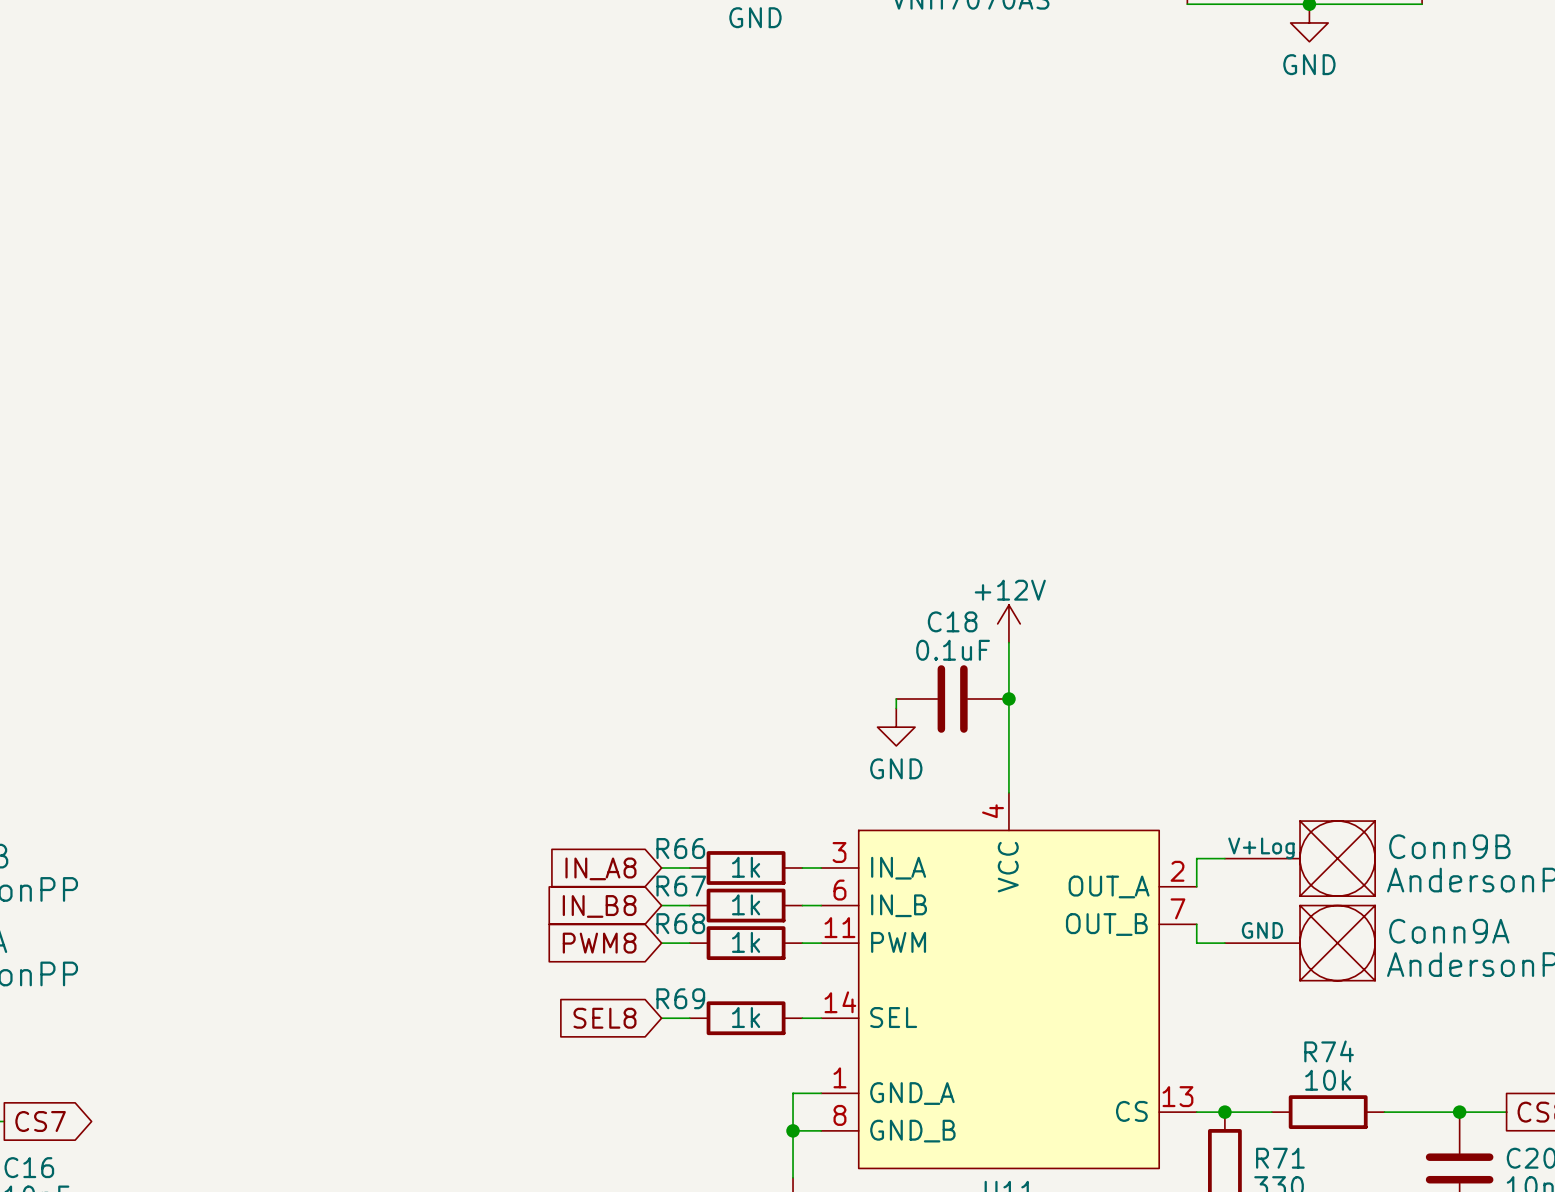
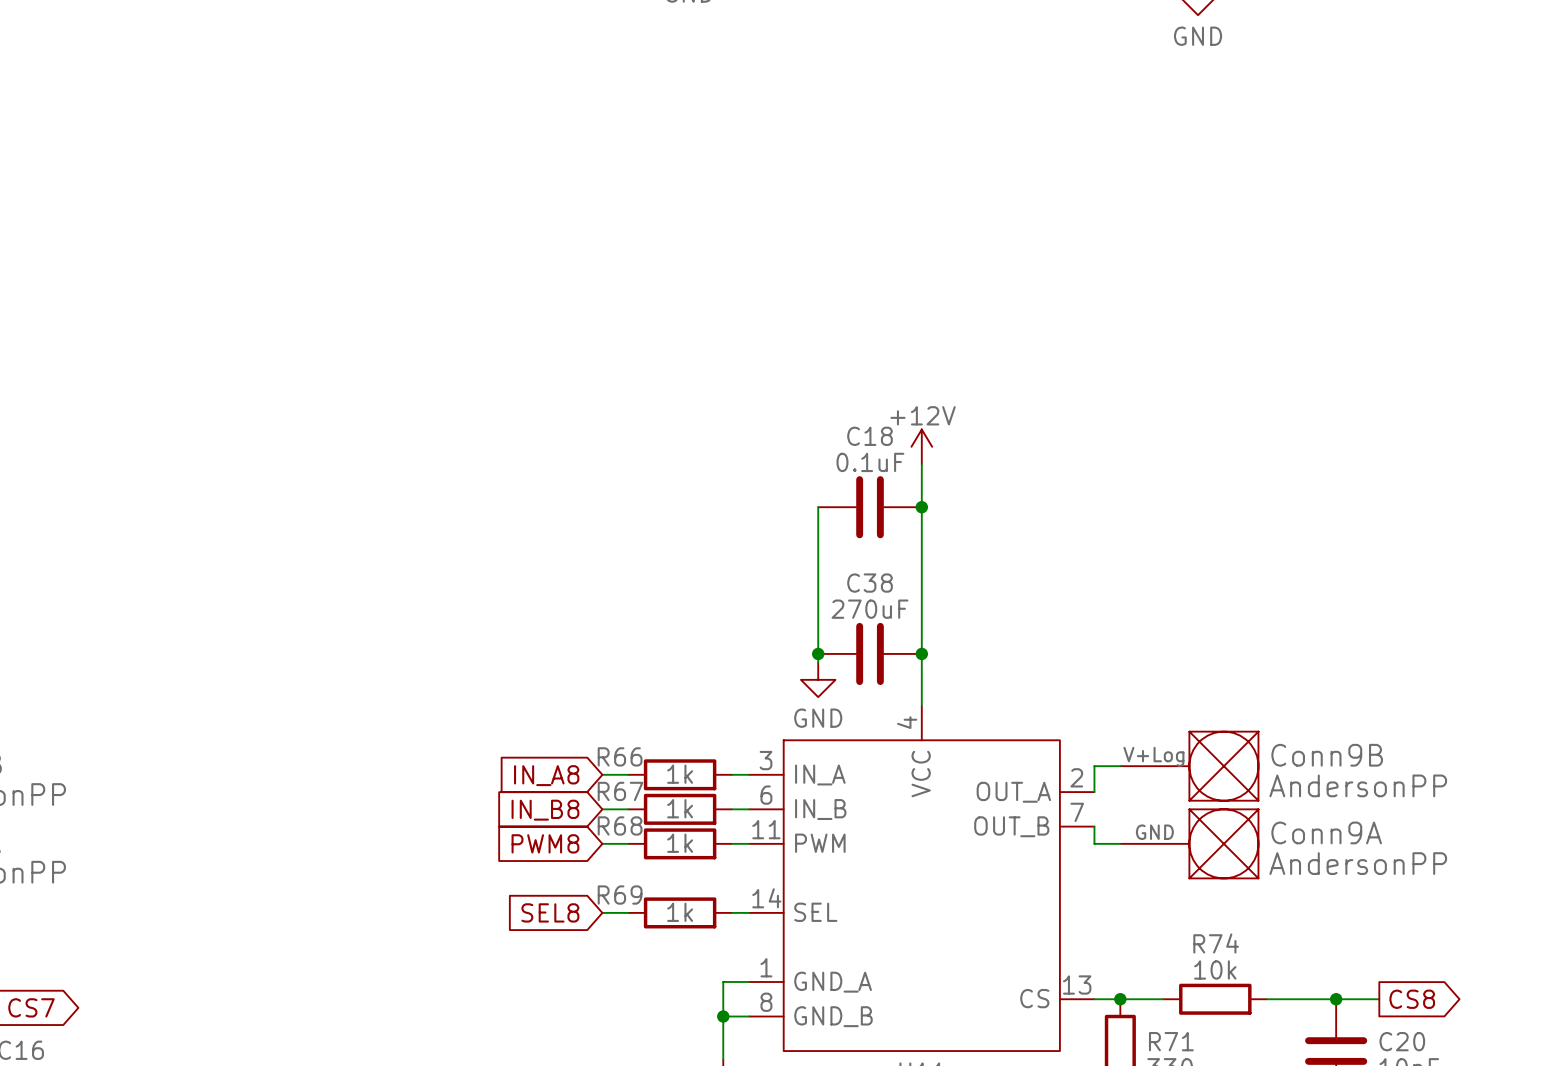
wire: none -> (921, 464) (921, 567)
wire: none -> (818, 507) (818, 619)
junction: none -> (921, 507)
power symbol position: +12V (1008, 623) -> +12V (921, 446)
C18 position: (952, 698) -> (870, 507)
junction position: (1008, 698) -> (921, 653)
power symbol position: GND (896, 727) -> GND (818, 679)
junction: none -> (818, 653)
C38: none -> 270uF (870, 653)

